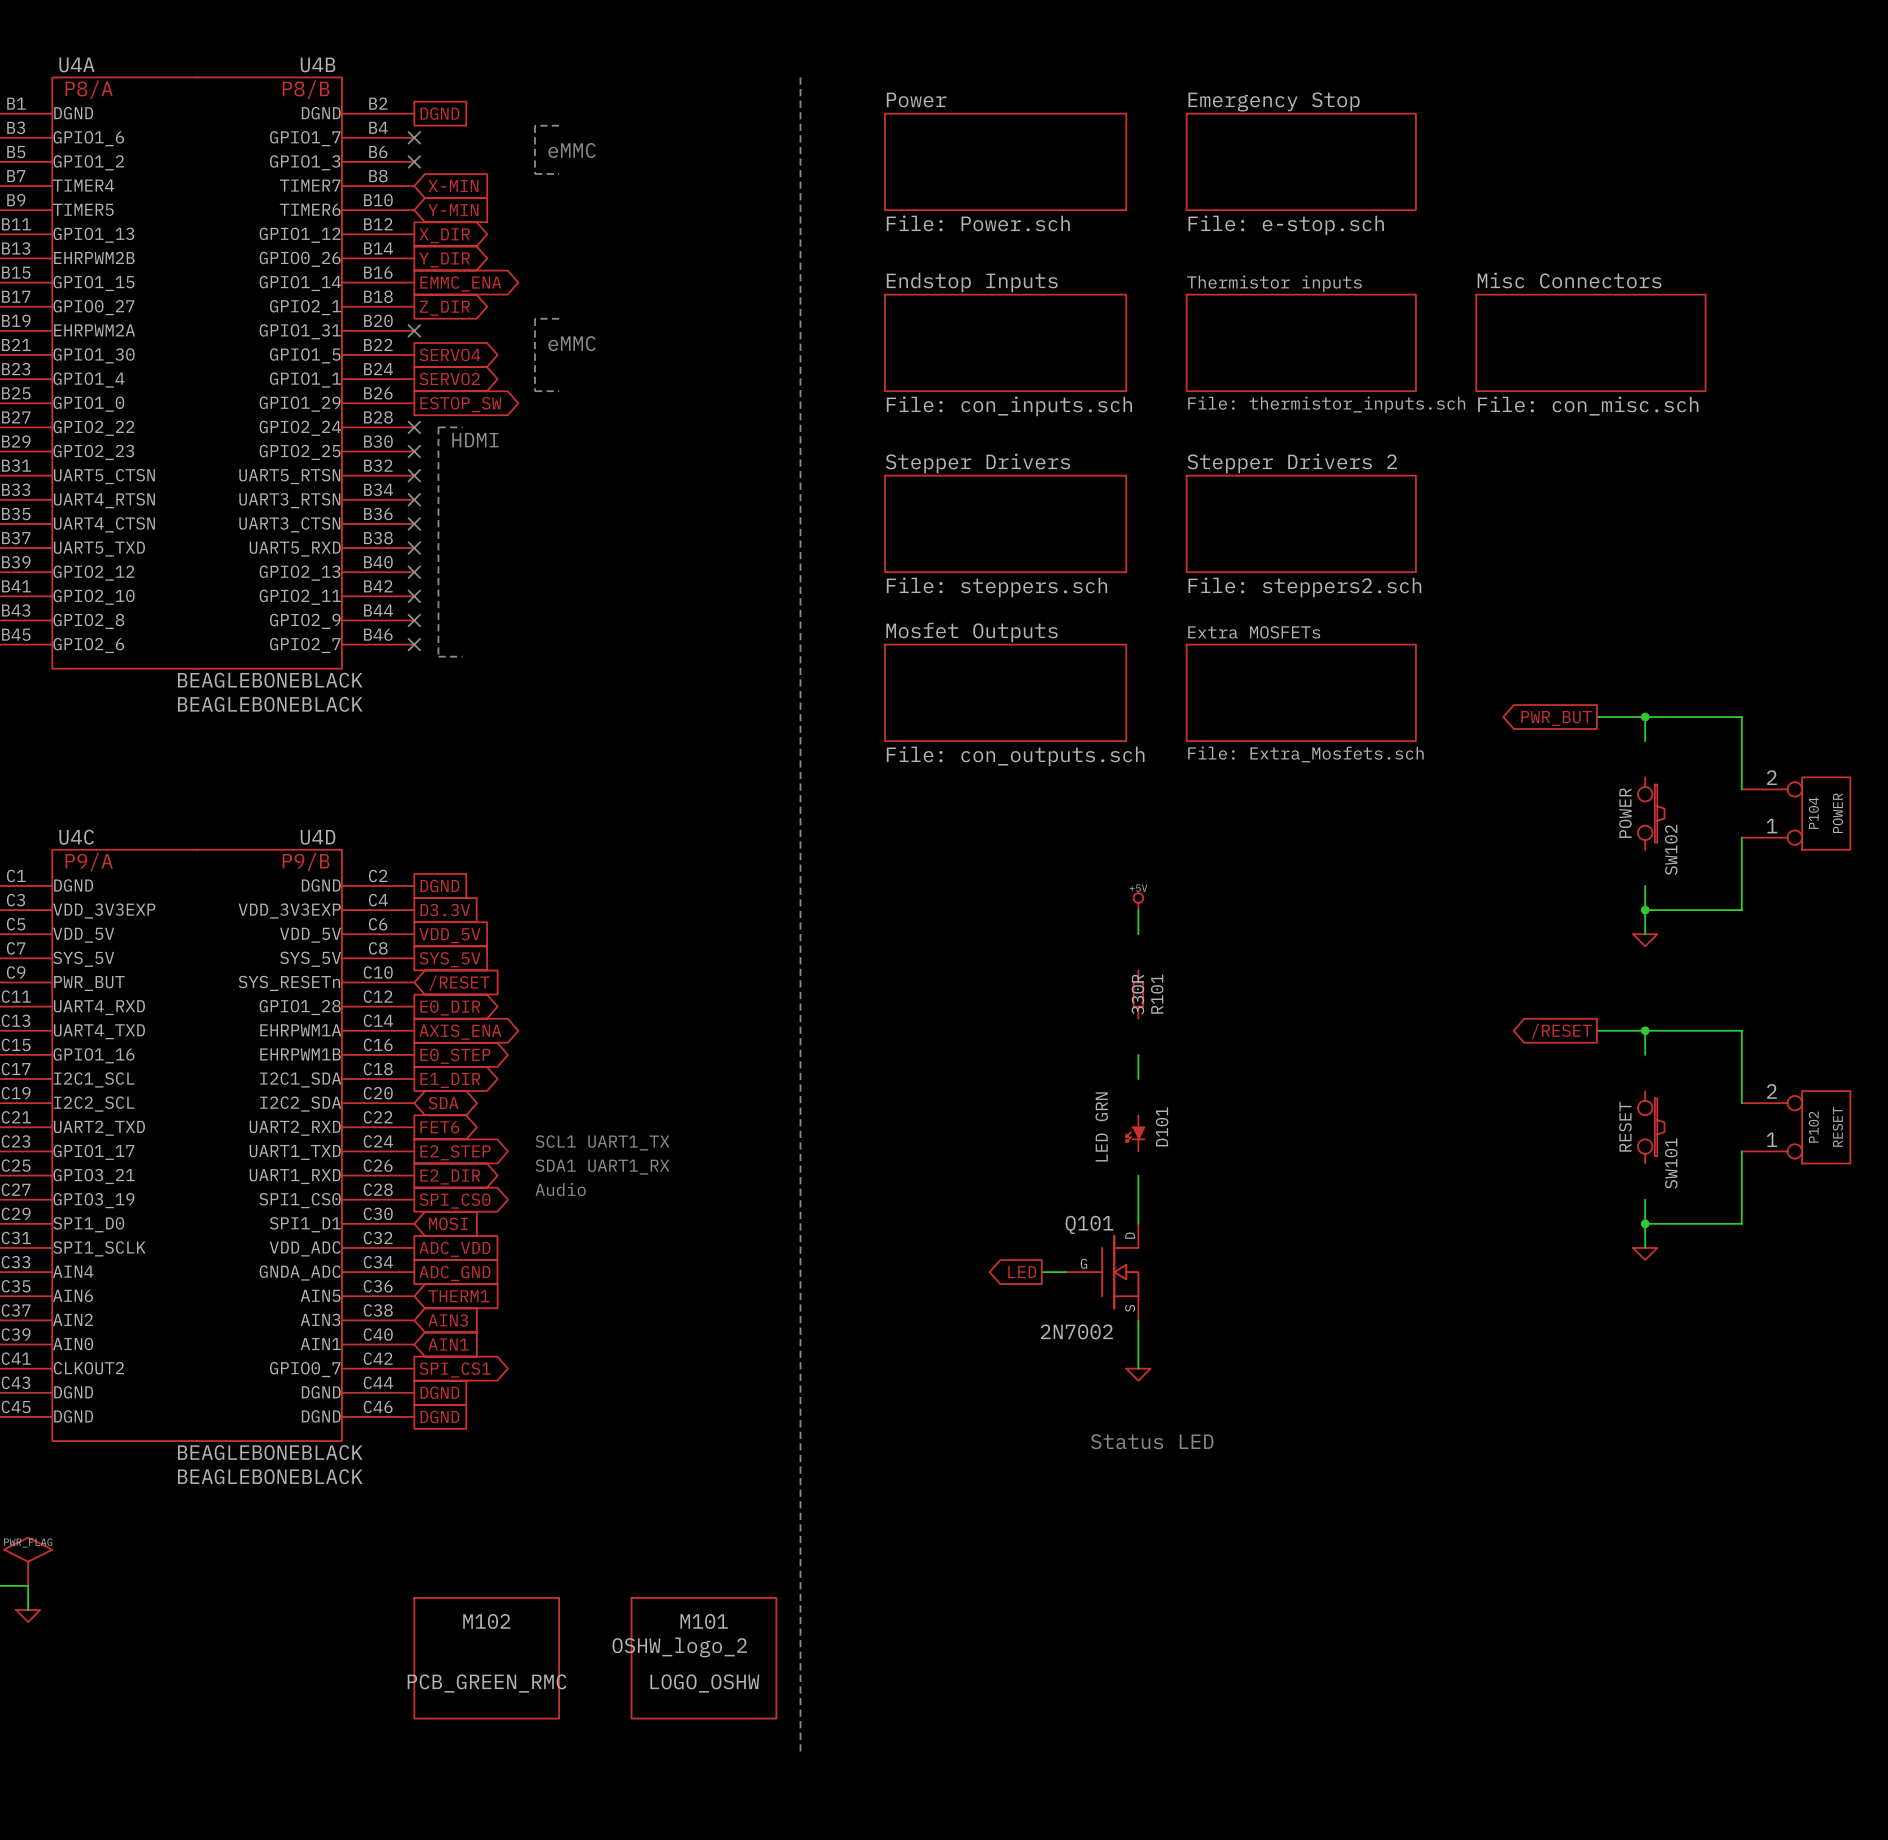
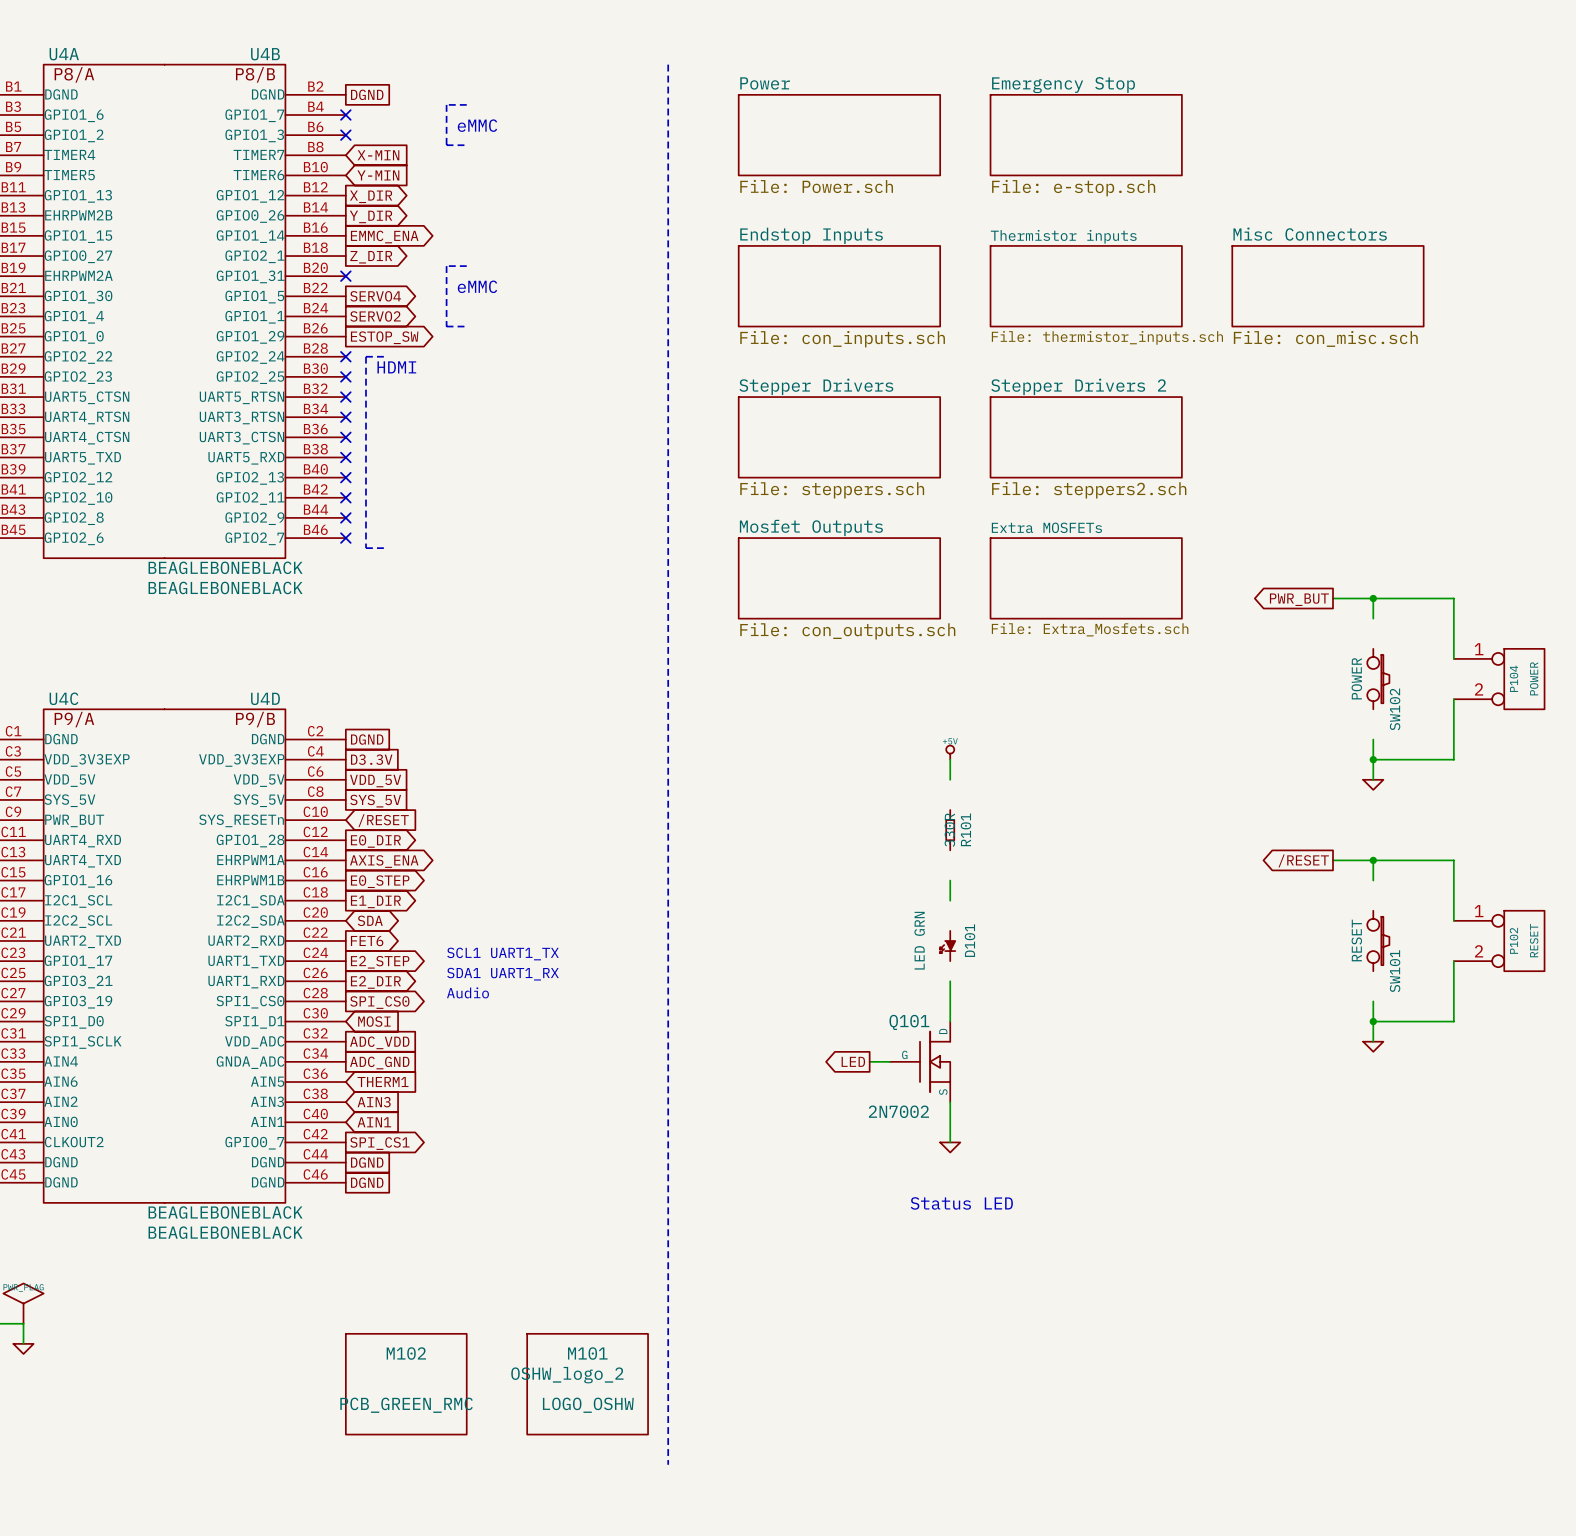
P104 flip: as is (1826, 813) -> up-down (1524, 679)
P102 flip: as is (1826, 1127) -> up-down (1524, 940)

